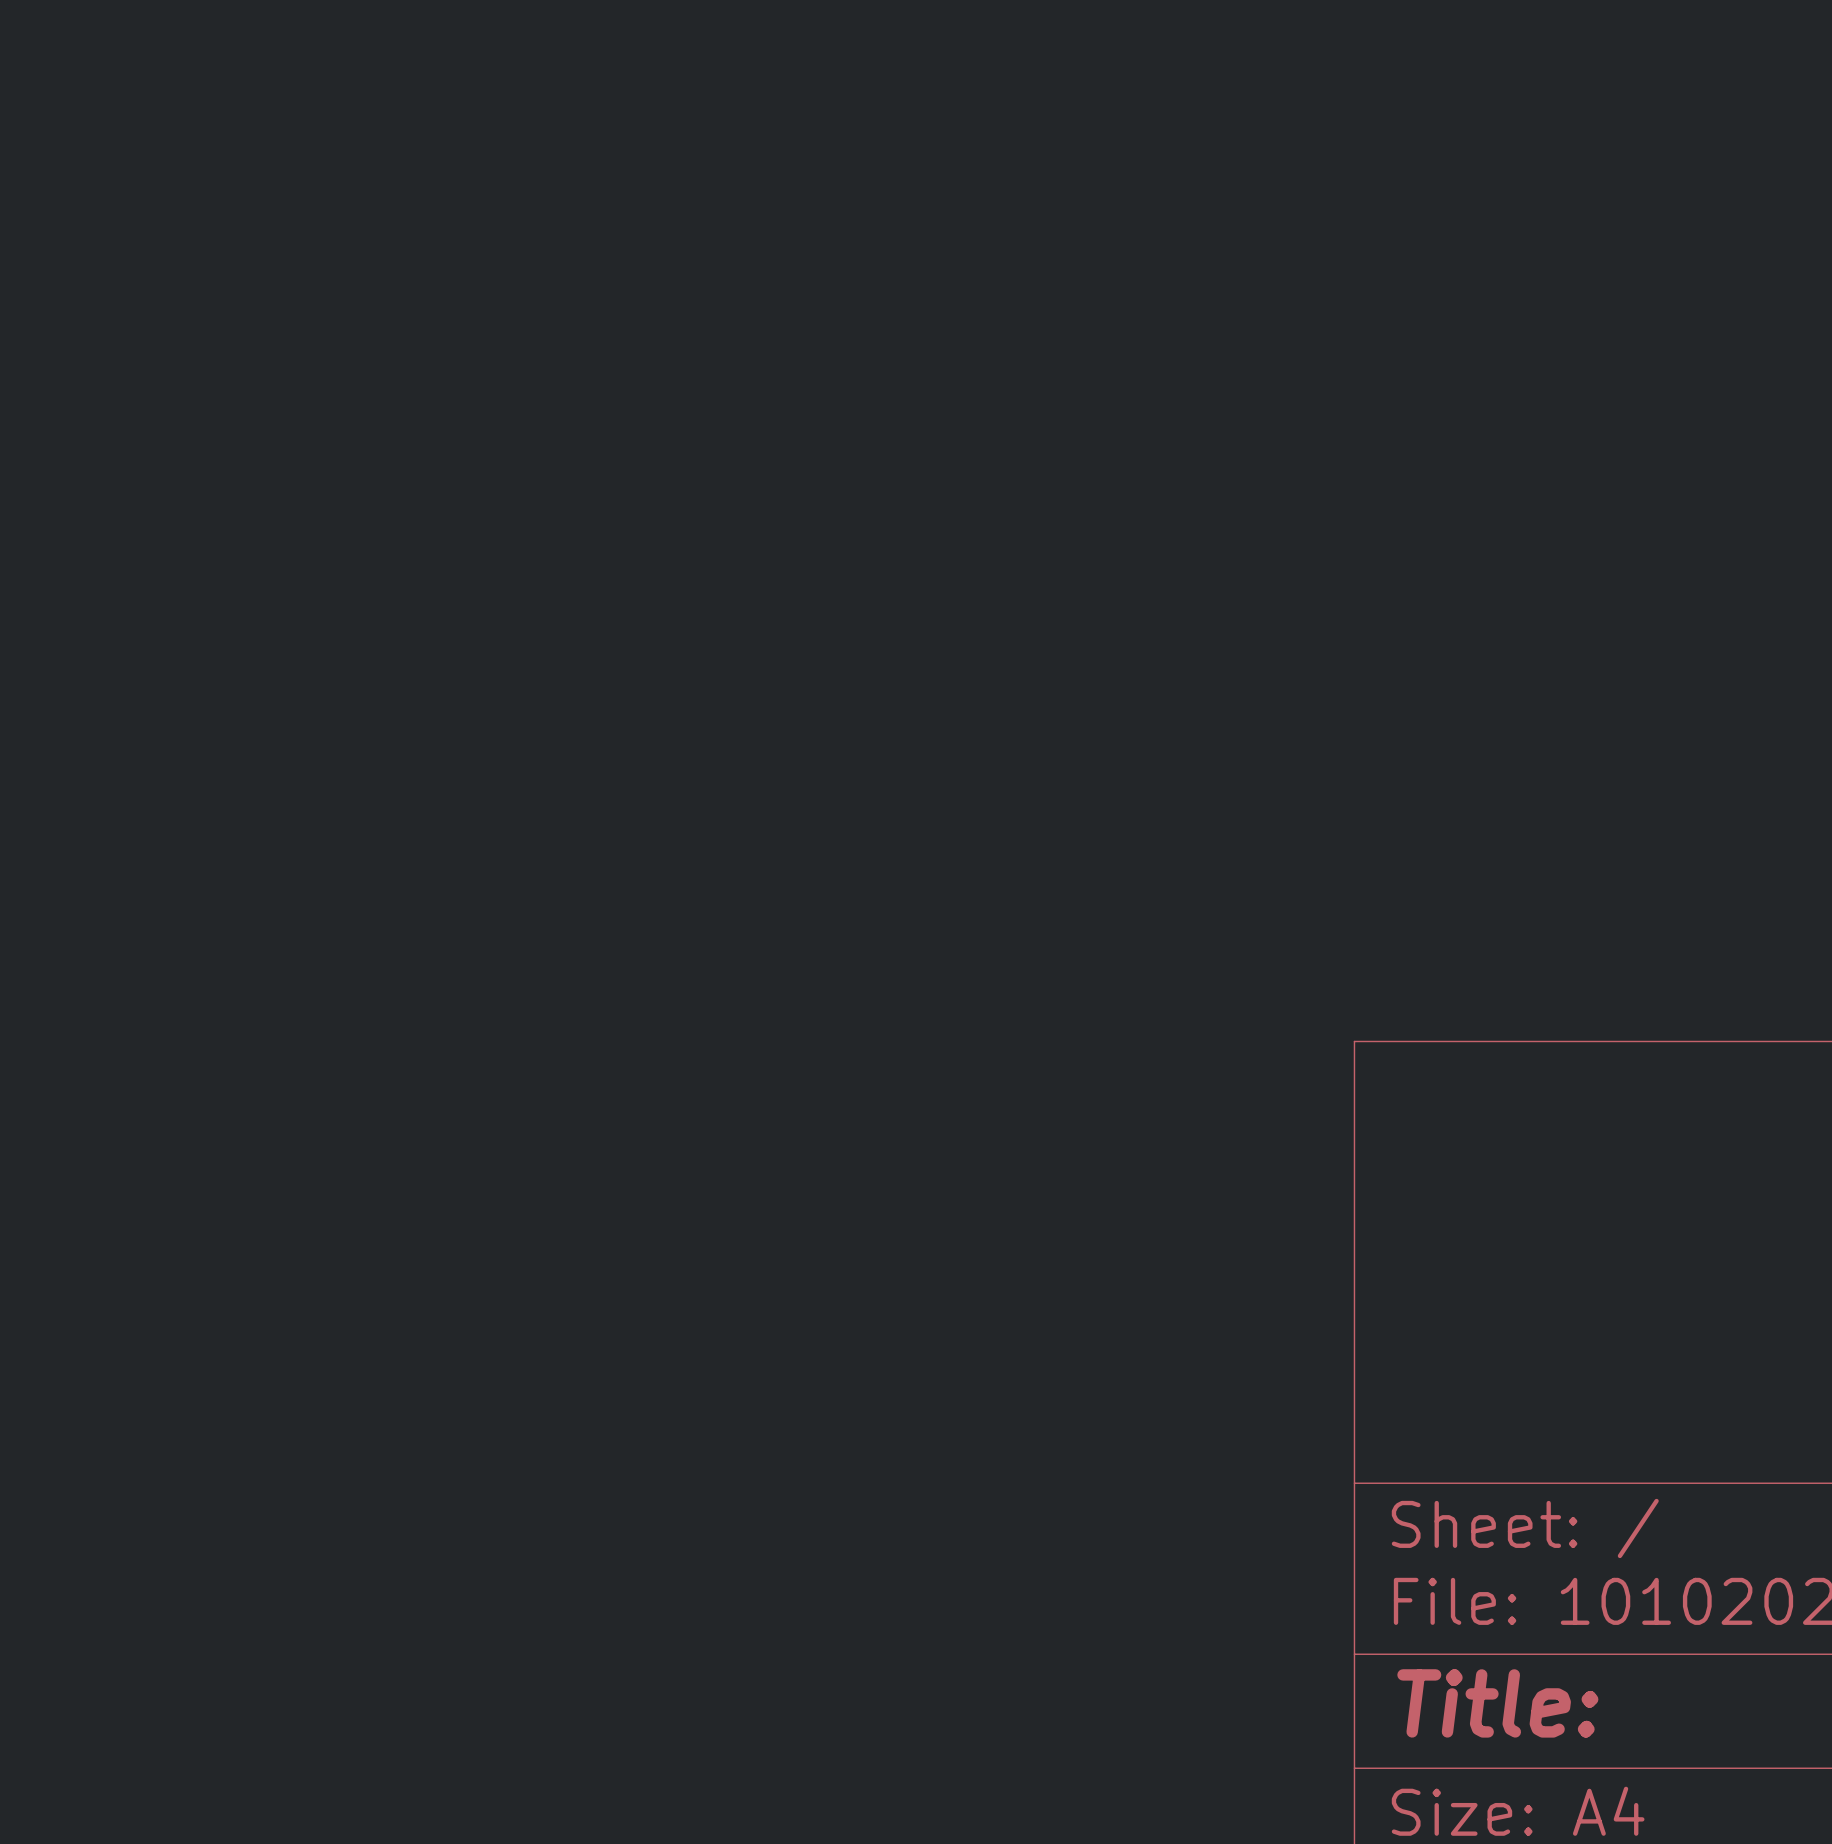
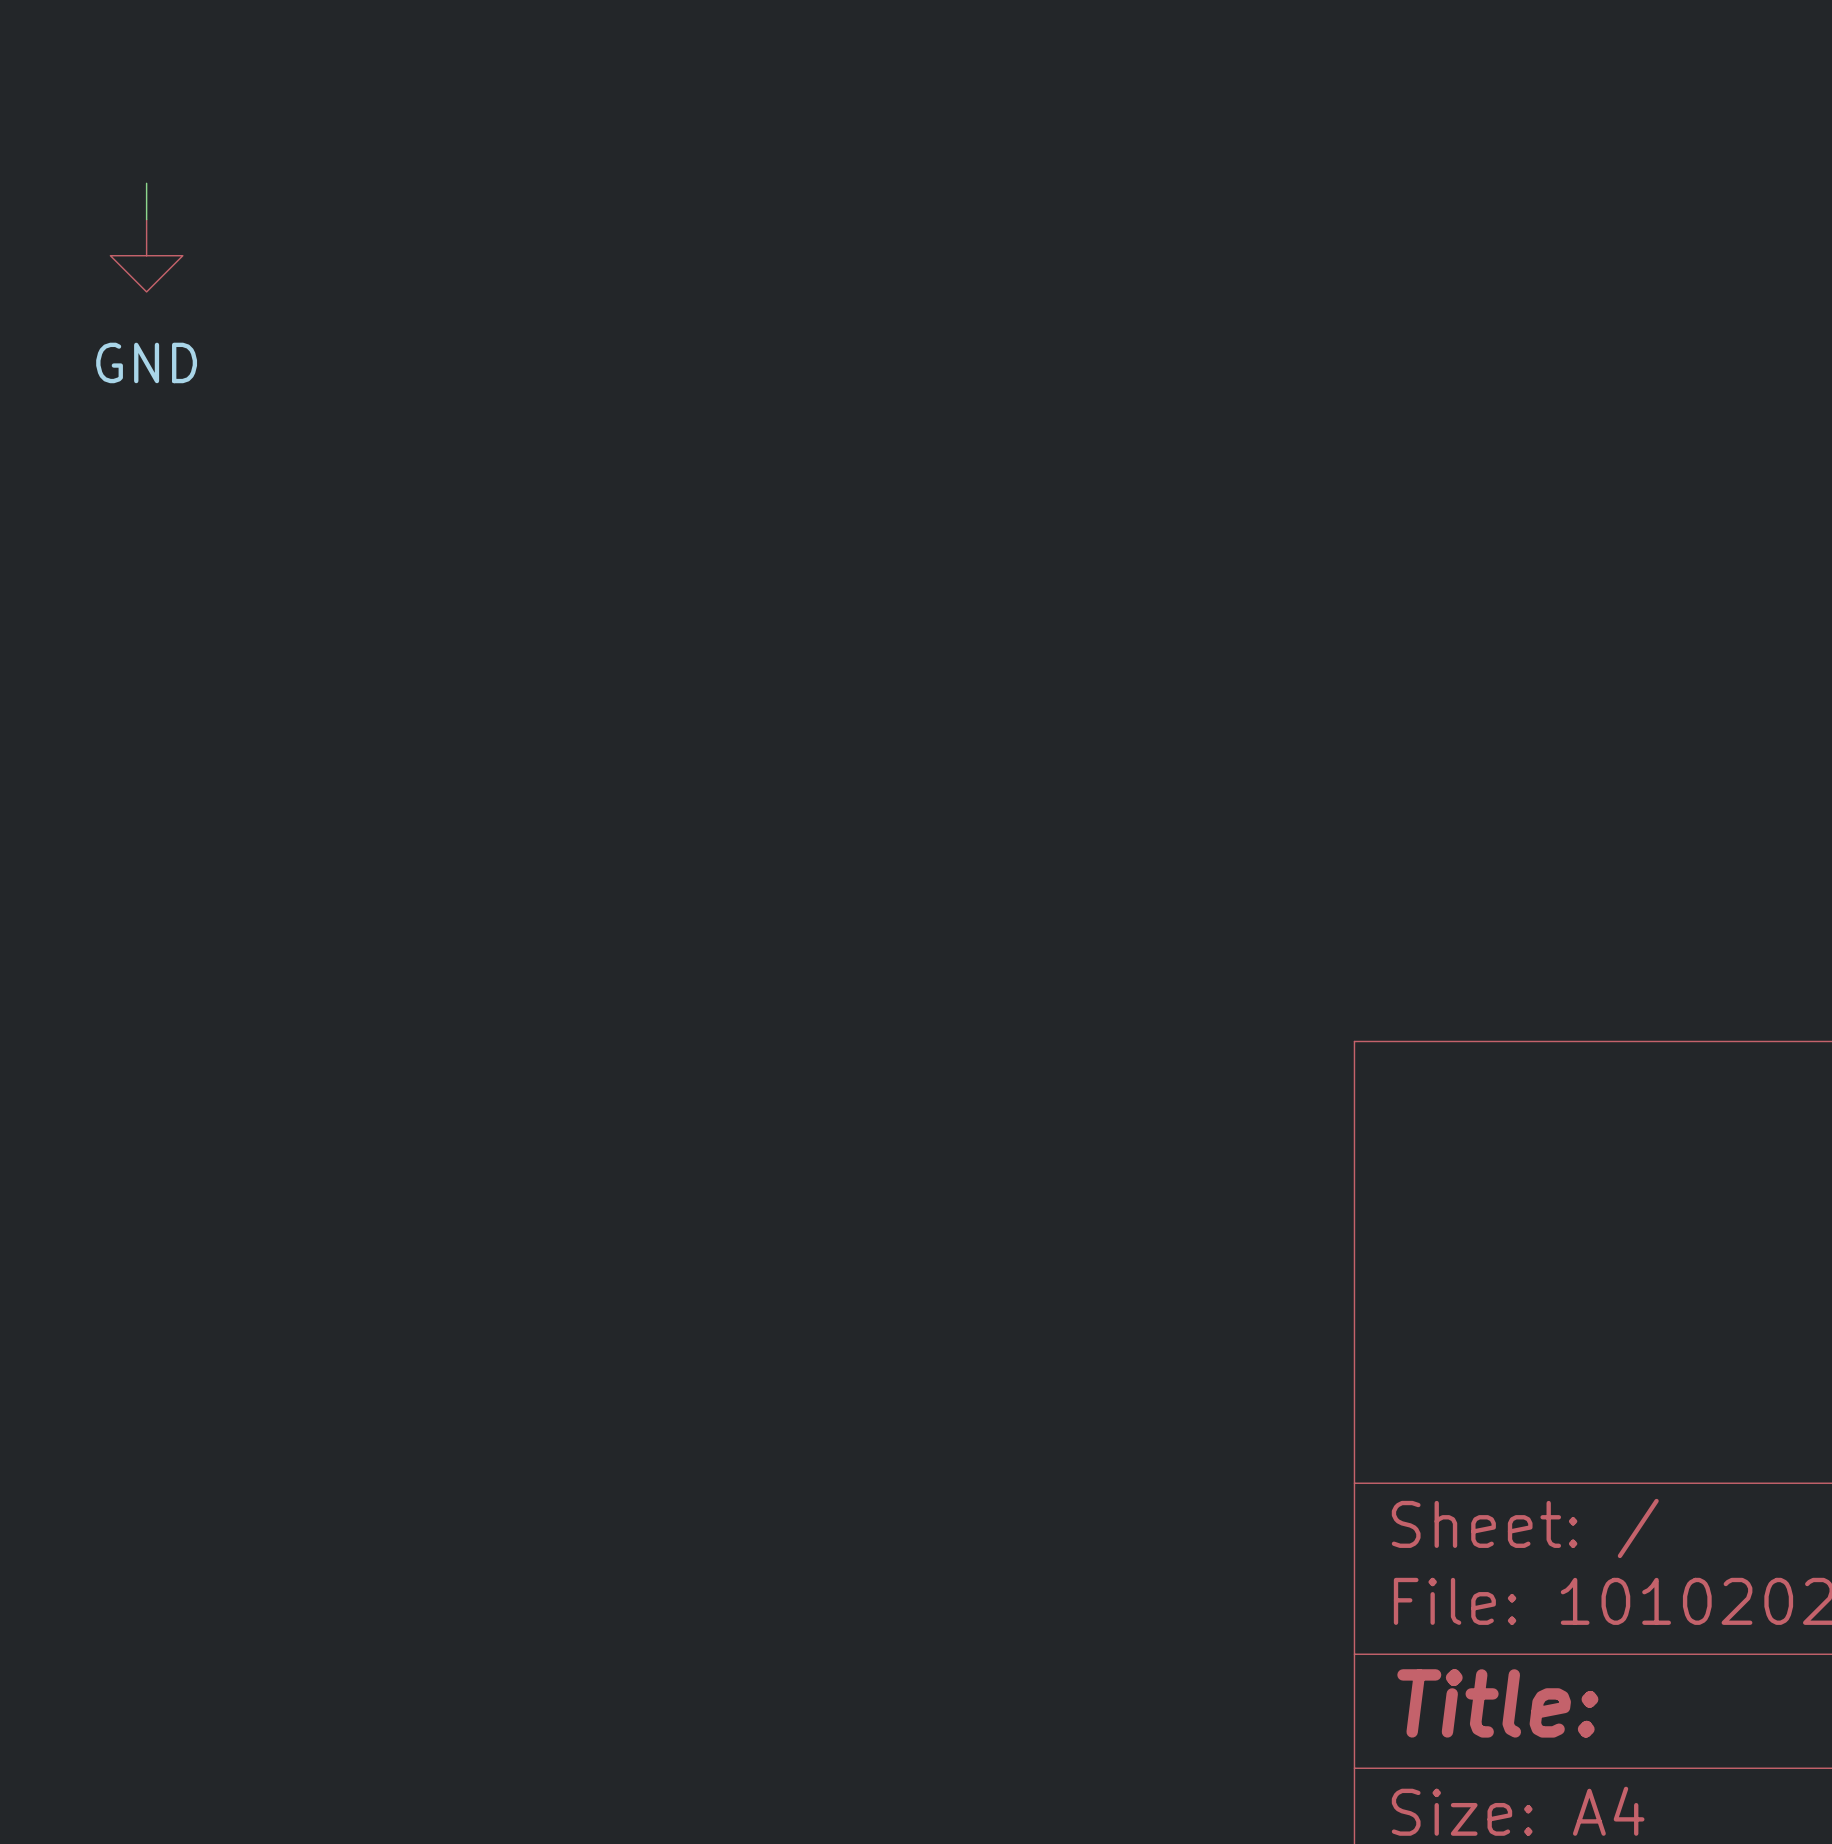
wire: none -> (146, 183) (146, 219)
power symbol: none -> GND (146, 255)

